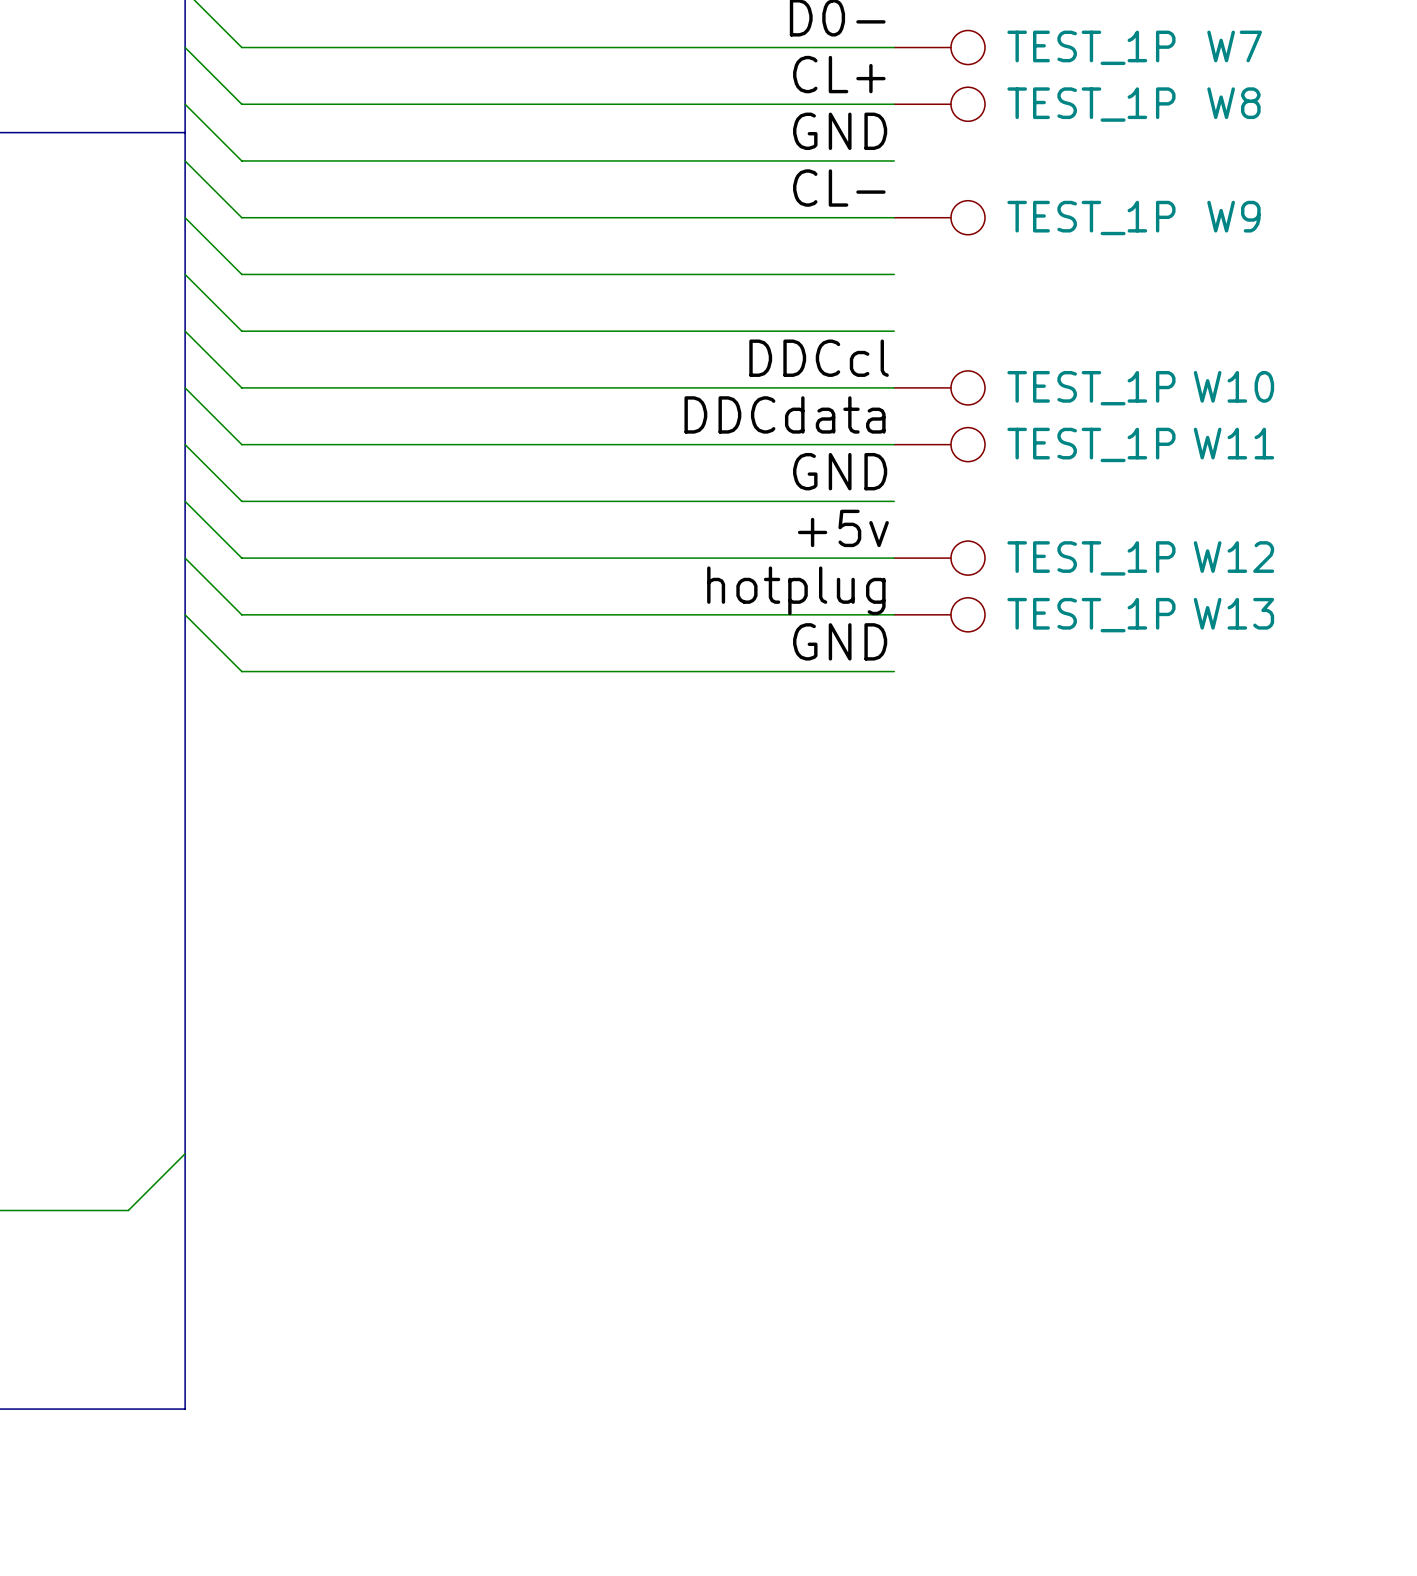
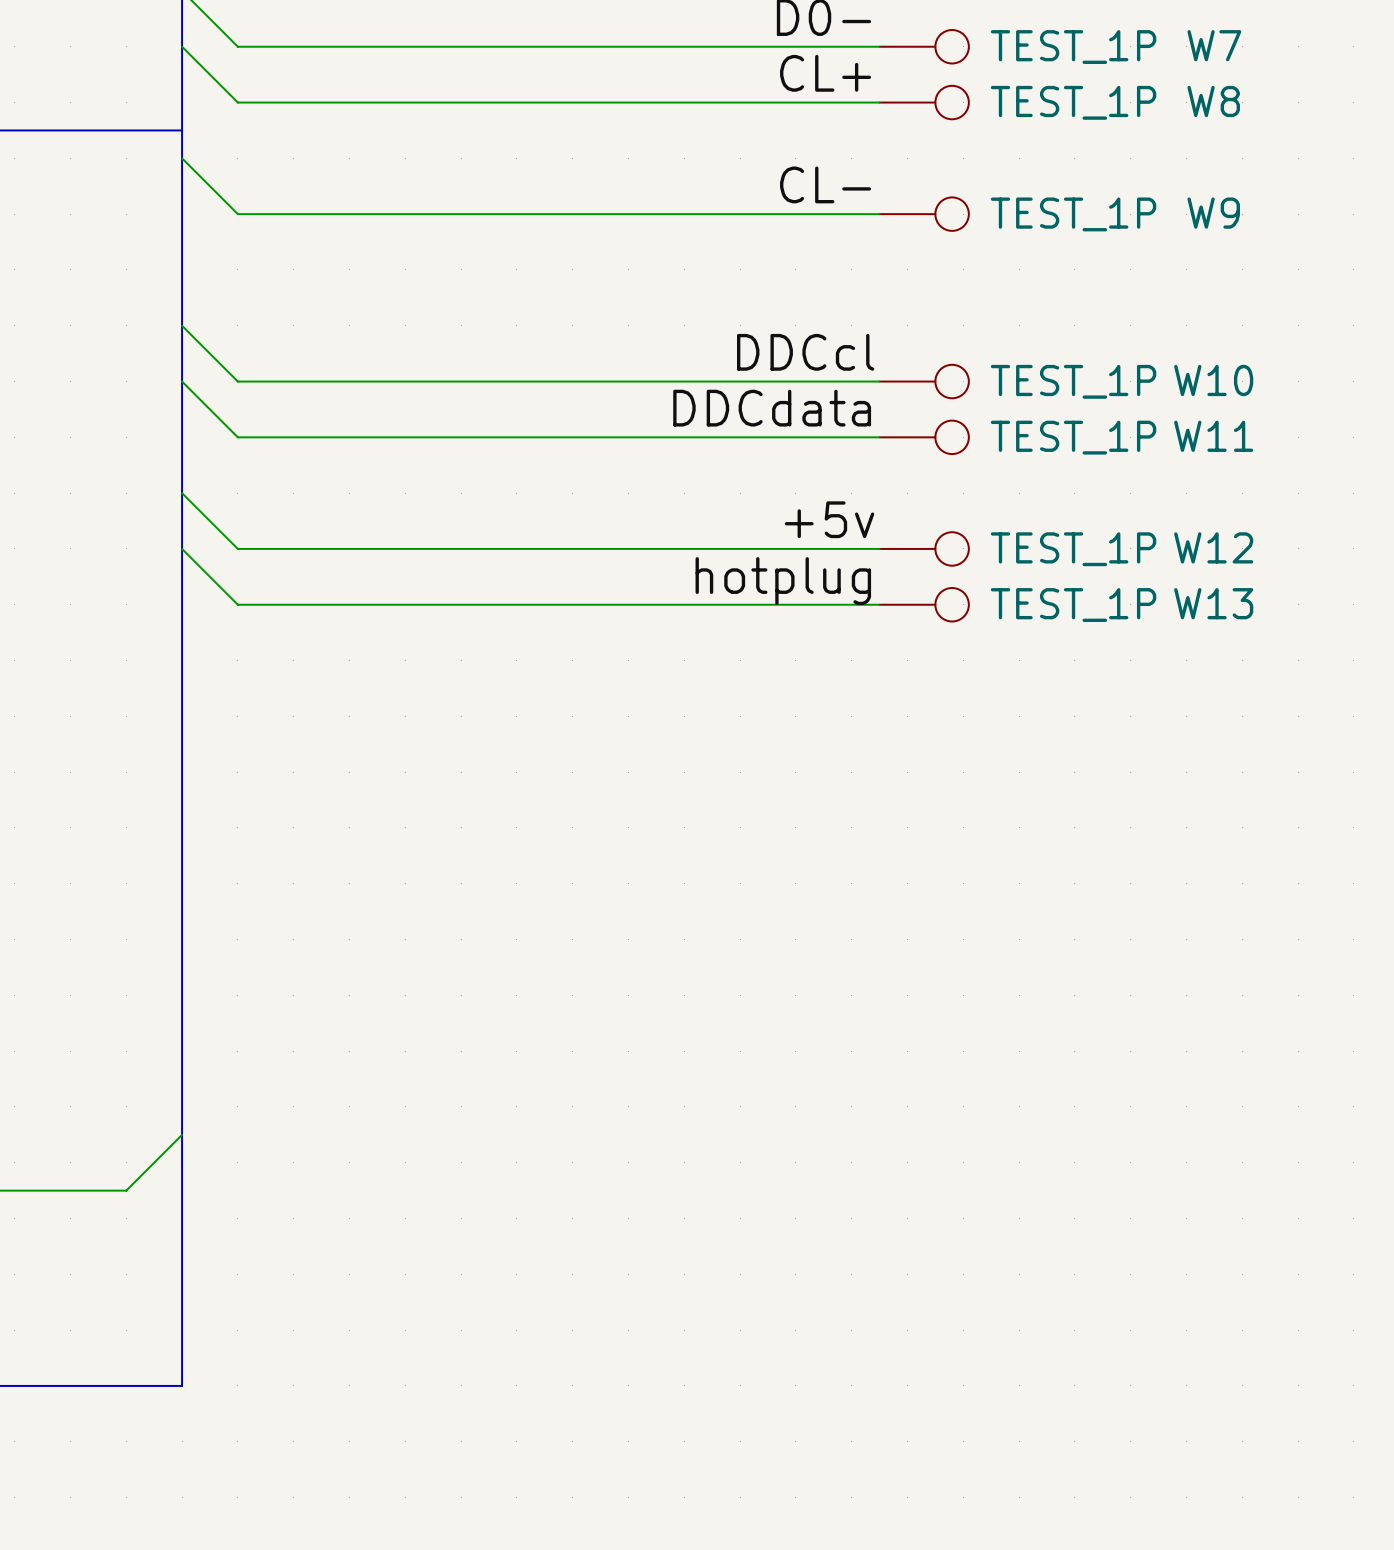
wire: (185, 104) (241, 160) (894, 160) -> none
label: GND (840, 131) -> none
wire: (185, 217) (241, 274) (894, 274) -> none
wire: (185, 274) (241, 331) (894, 331) -> none
wire: (185, 444) (241, 501) (894, 501) -> none
label: GND (840, 471) -> none
wire: (185, 614) (241, 671) (894, 671) -> none
label: GND (840, 641) -> none

